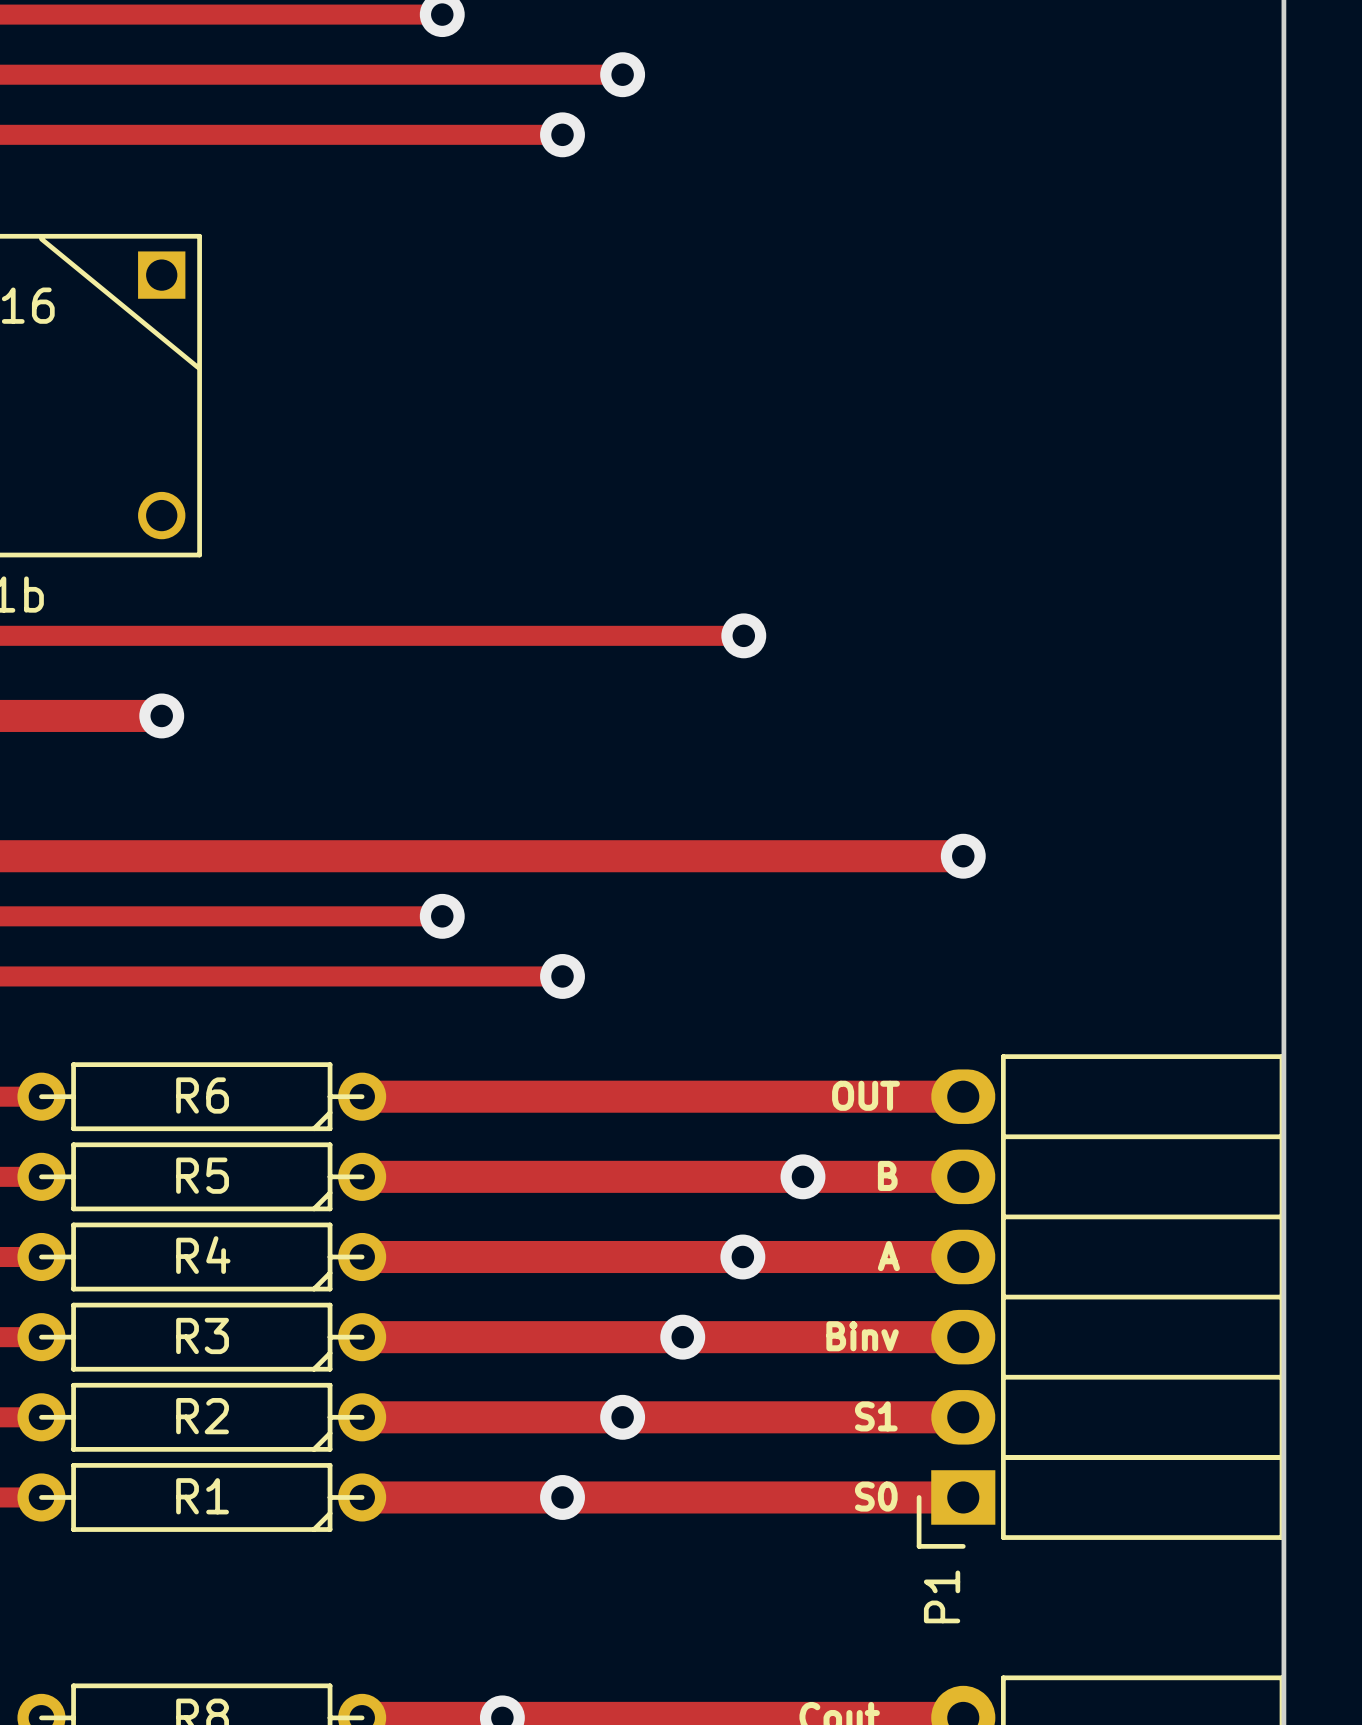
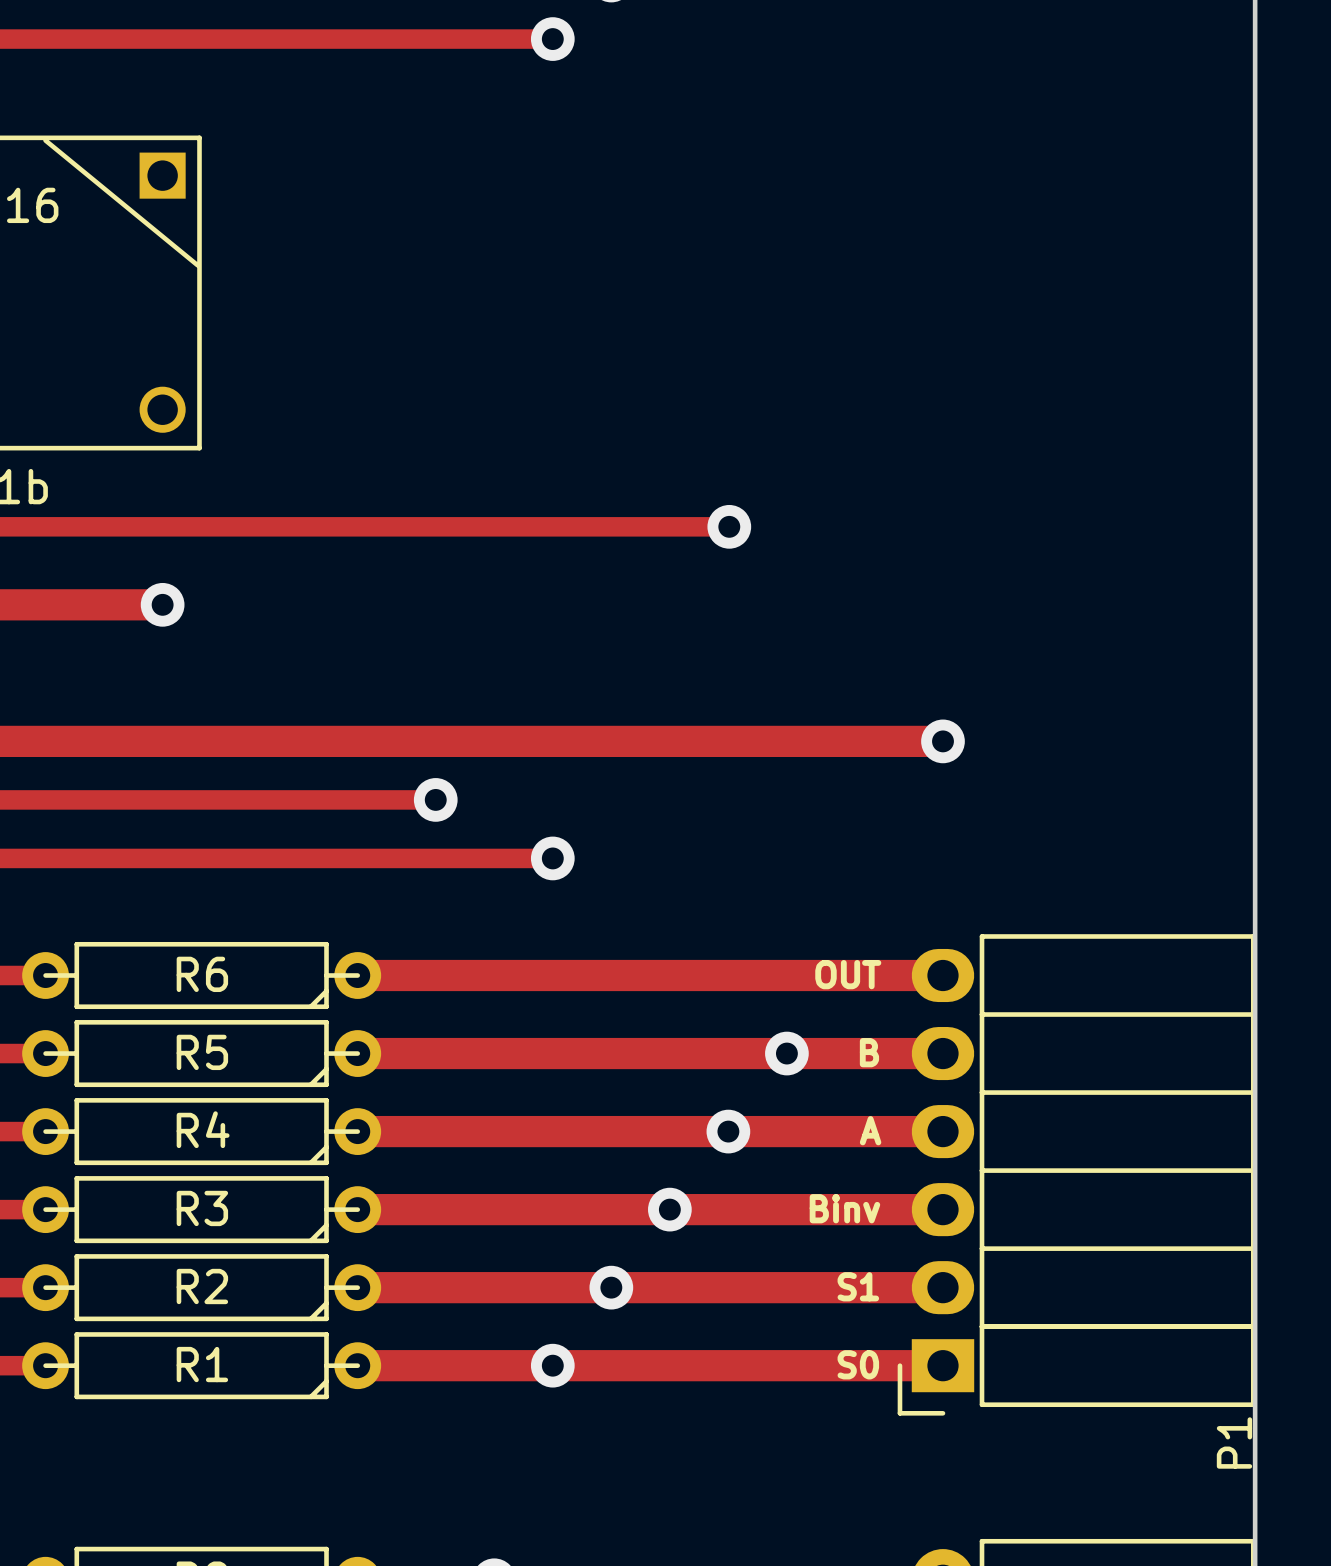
P1 name position: P1 (942, 1596) -> P1 (1234, 1442)

